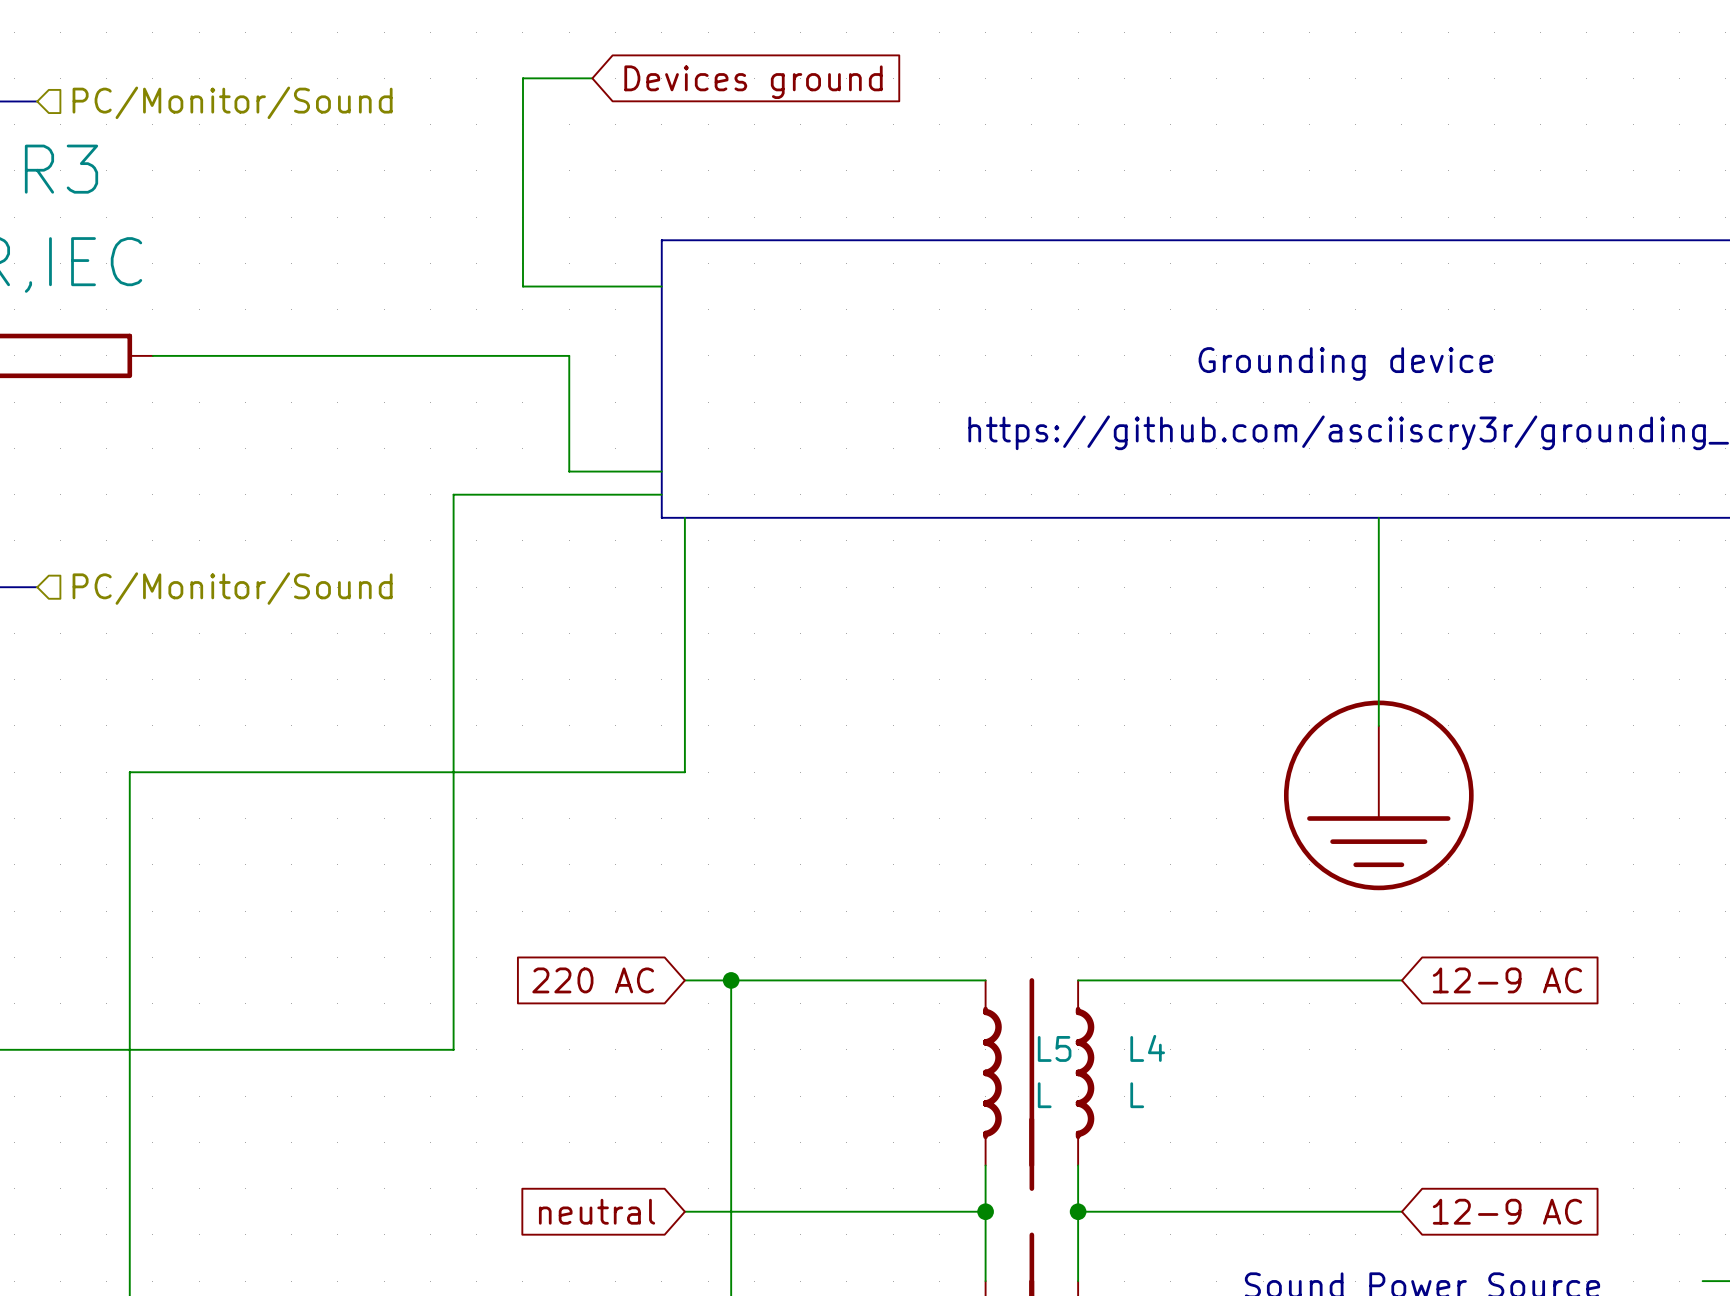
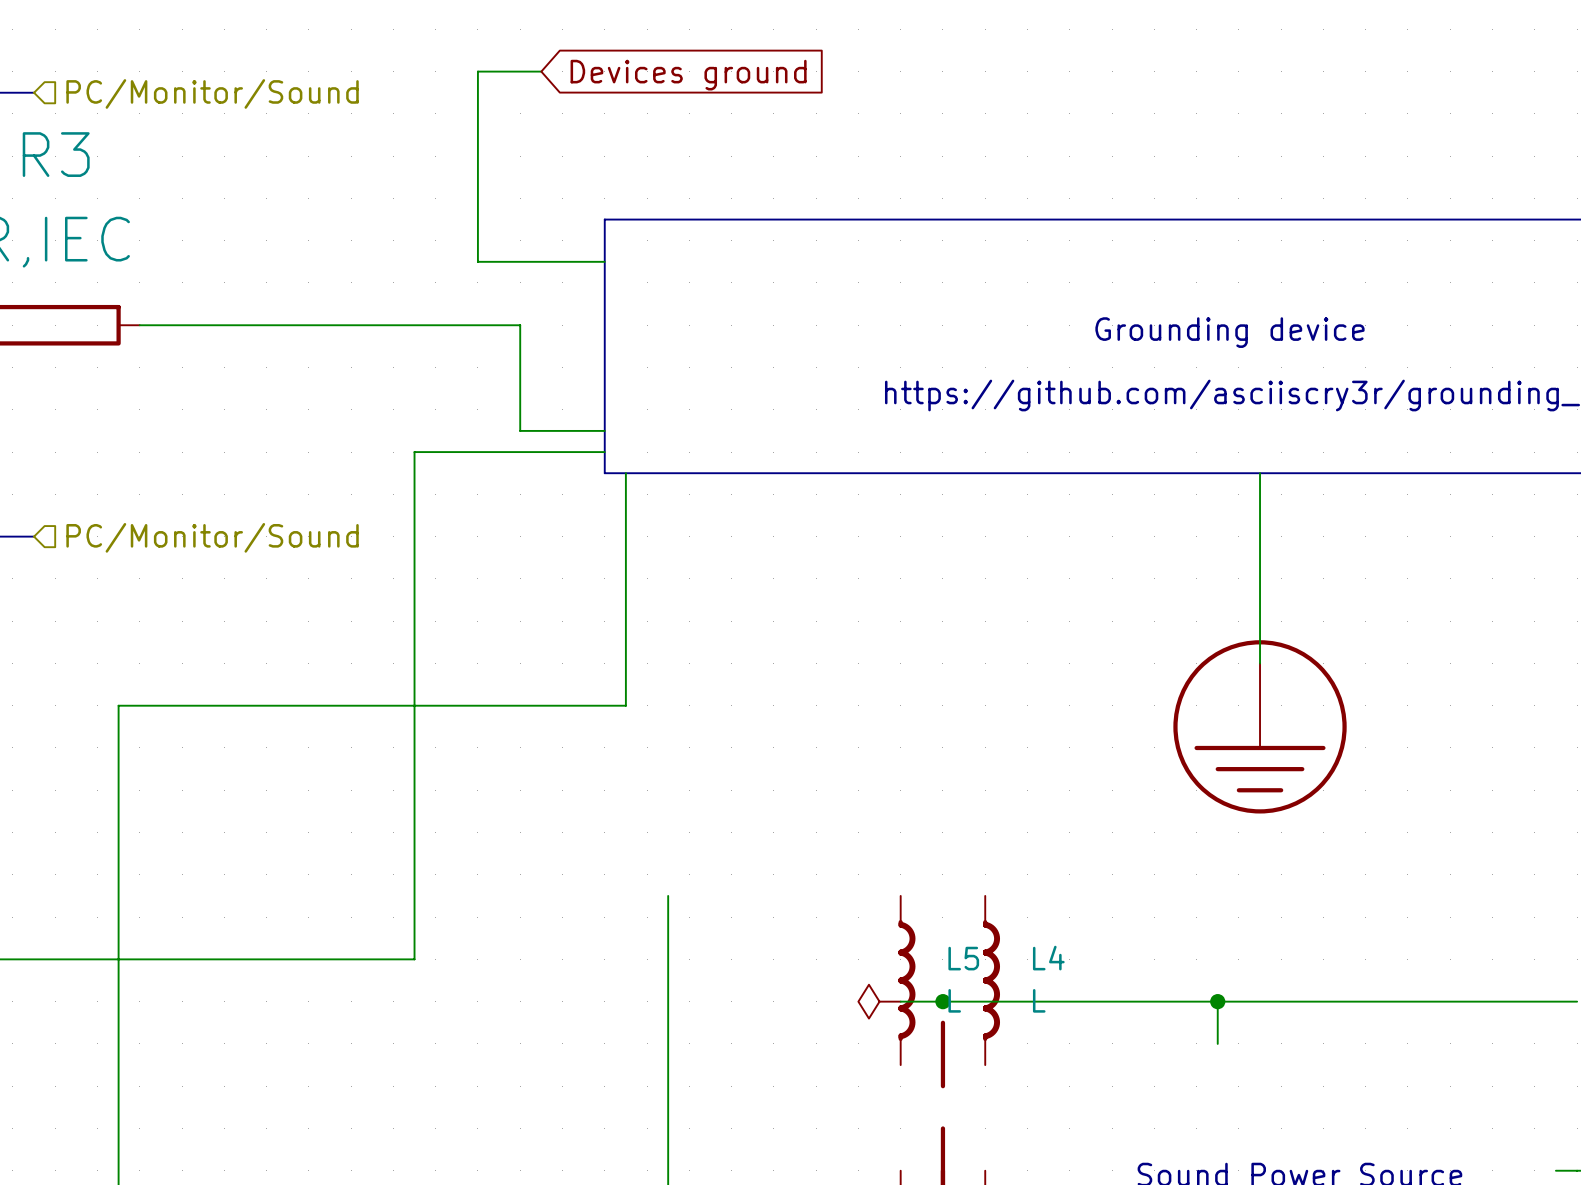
global label: 220 AC (593, 980) -> none
wire: (684, 980) (985, 980) -> none
junction: (731, 980) -> none
wire: (1078, 980) (1401, 980) -> none
global label: 12-9 AC (1507, 980) -> none
power symbol: (1031, 1072) -> none
power symbol: none -> (879, 1001)
wire: none -> (900, 1001) (1577, 1001)
junction: none -> (942, 1001)
wire: none -> (1217, 1001) (1217, 1043)
junction: none -> (1217, 1001)
wire: (985, 1165) (985, 1281) -> none
wire: (1078, 1165) (1078, 1281) -> none
global label: neutral (597, 1211) -> none
wire: (684, 1211) (985, 1211) -> none
junction: (985, 1211) -> none
wire: (1078, 1211) (1401, 1211) -> none
junction: (1078, 1211) -> none
global label: 12-9 AC (1507, 1211) -> none

